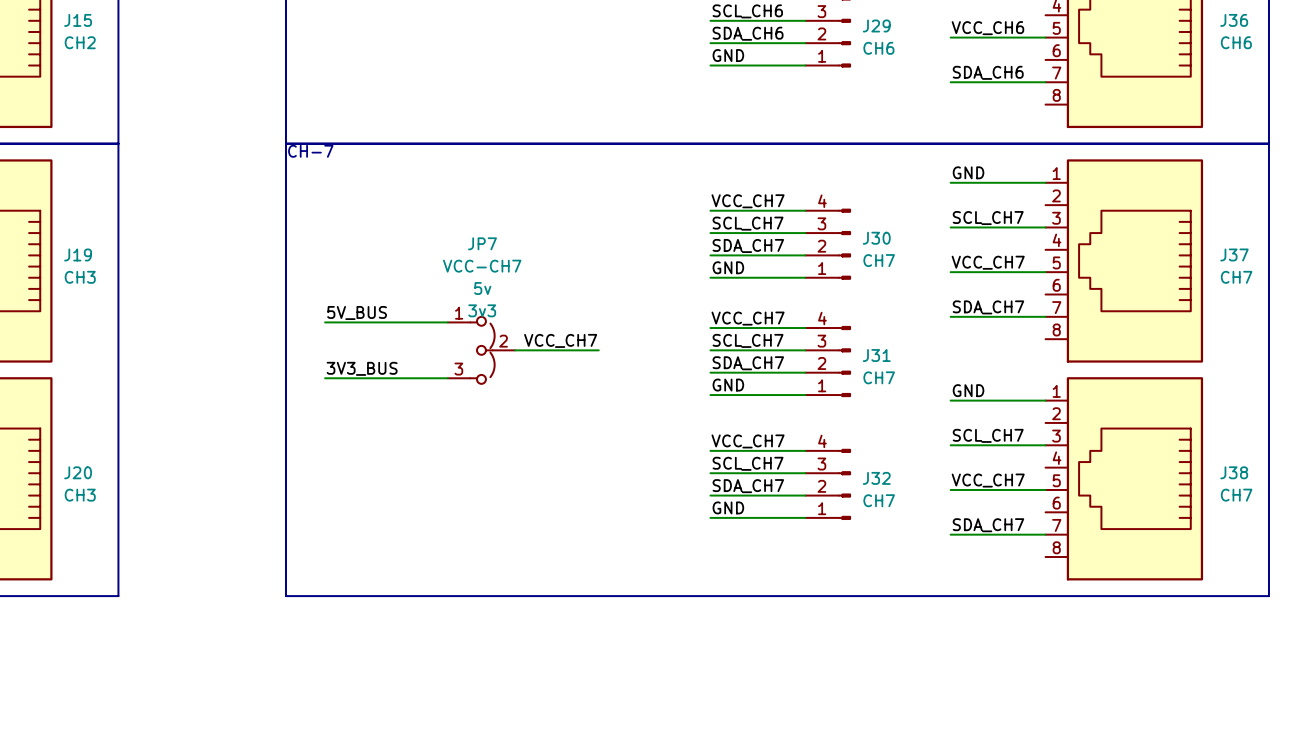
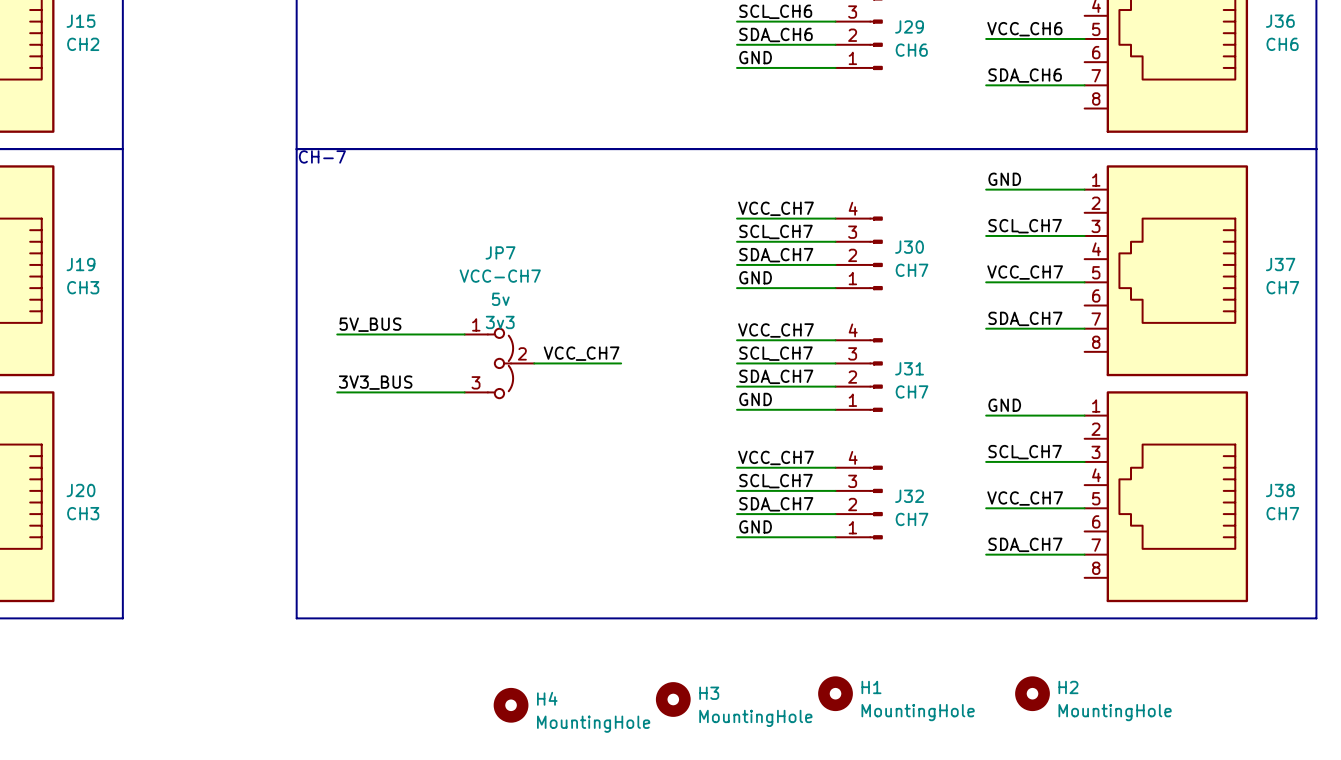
H1: none -> MountingHole (835, 693)
H2: none -> MountingHole (1032, 693)
H3: none -> MountingHole (673, 699)
H4: none -> MountingHole (511, 705)

